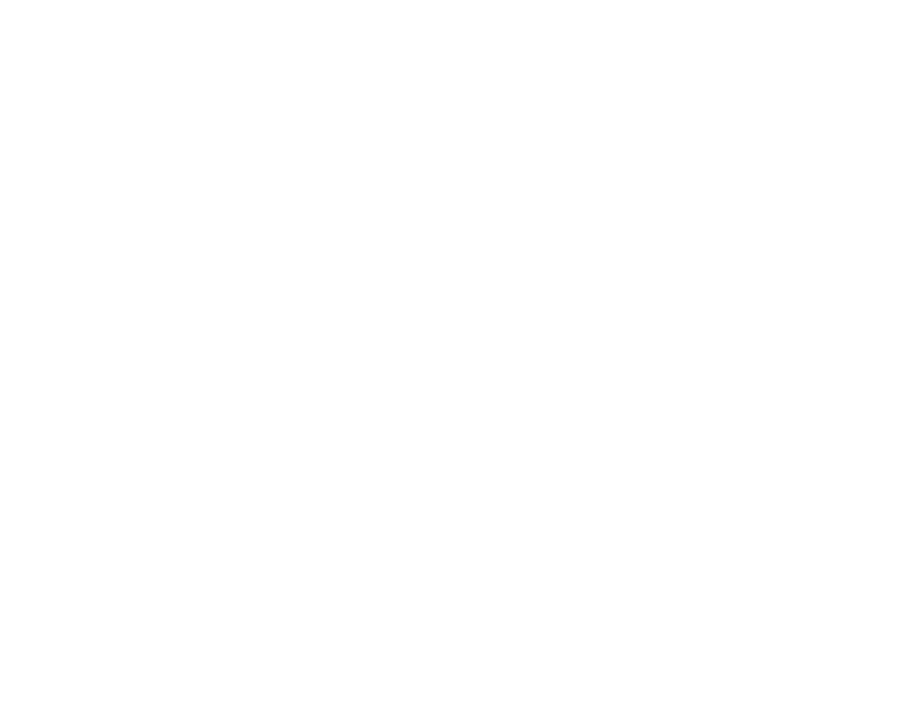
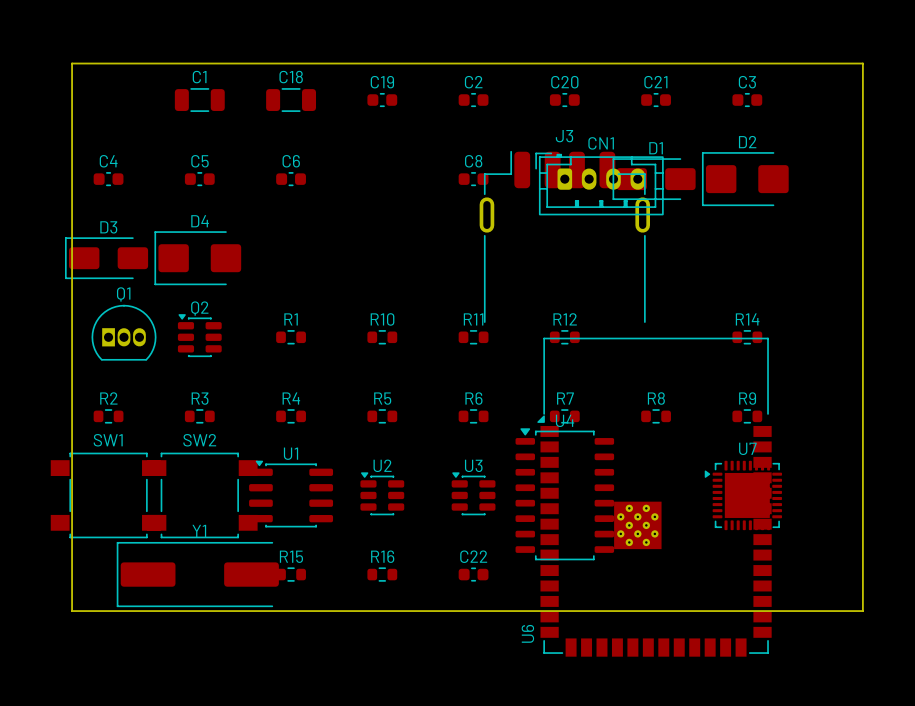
board edge: none -> (72, 63) (862, 63) (862, 611) (72, 611) (72, 63)
C1: none -> (199, 100)
C18: none -> (291, 100)
C19: none -> (382, 100)
C2: none -> (473, 100)
C20: none -> (564, 100)
C21: none -> (656, 100)
C3: none -> (747, 100)
C4: none -> (108, 179)
C5: none -> (199, 179)
C6: none -> (291, 179)
C8: none -> (473, 179)
D1: none -> (654, 179)
D2: none -> (745, 179)
CN1: none -> (599, 183)
J3: none -> (564, 236)
D3: none -> (106, 258)
D4: none -> (197, 258)
Q1: none -> (124, 332)
Q2: none -> (199, 335)
R1: none -> (291, 337)
R10: none -> (382, 337)
R11: none -> (473, 337)
R12: none -> (564, 337)
R14: none -> (747, 337)
R2: none -> (108, 416)
R3: none -> (199, 416)
R4: none -> (291, 416)
R5: none -> (382, 416)
R6: none -> (473, 416)
R7: none -> (564, 416)
R8: none -> (656, 416)
R9: none -> (747, 416)
U2: none -> (382, 493)
U3: none -> (473, 493)
U1: none -> (291, 494)
U4: none -> (564, 494)
SW1: none -> (108, 495)
SW2: none -> (199, 495)
U7: none -> (743, 495)
U6: none -> (654, 497)
Y1: none -> (197, 574)
R15: none -> (291, 574)
R16: none -> (382, 574)
C22: none -> (473, 574)

